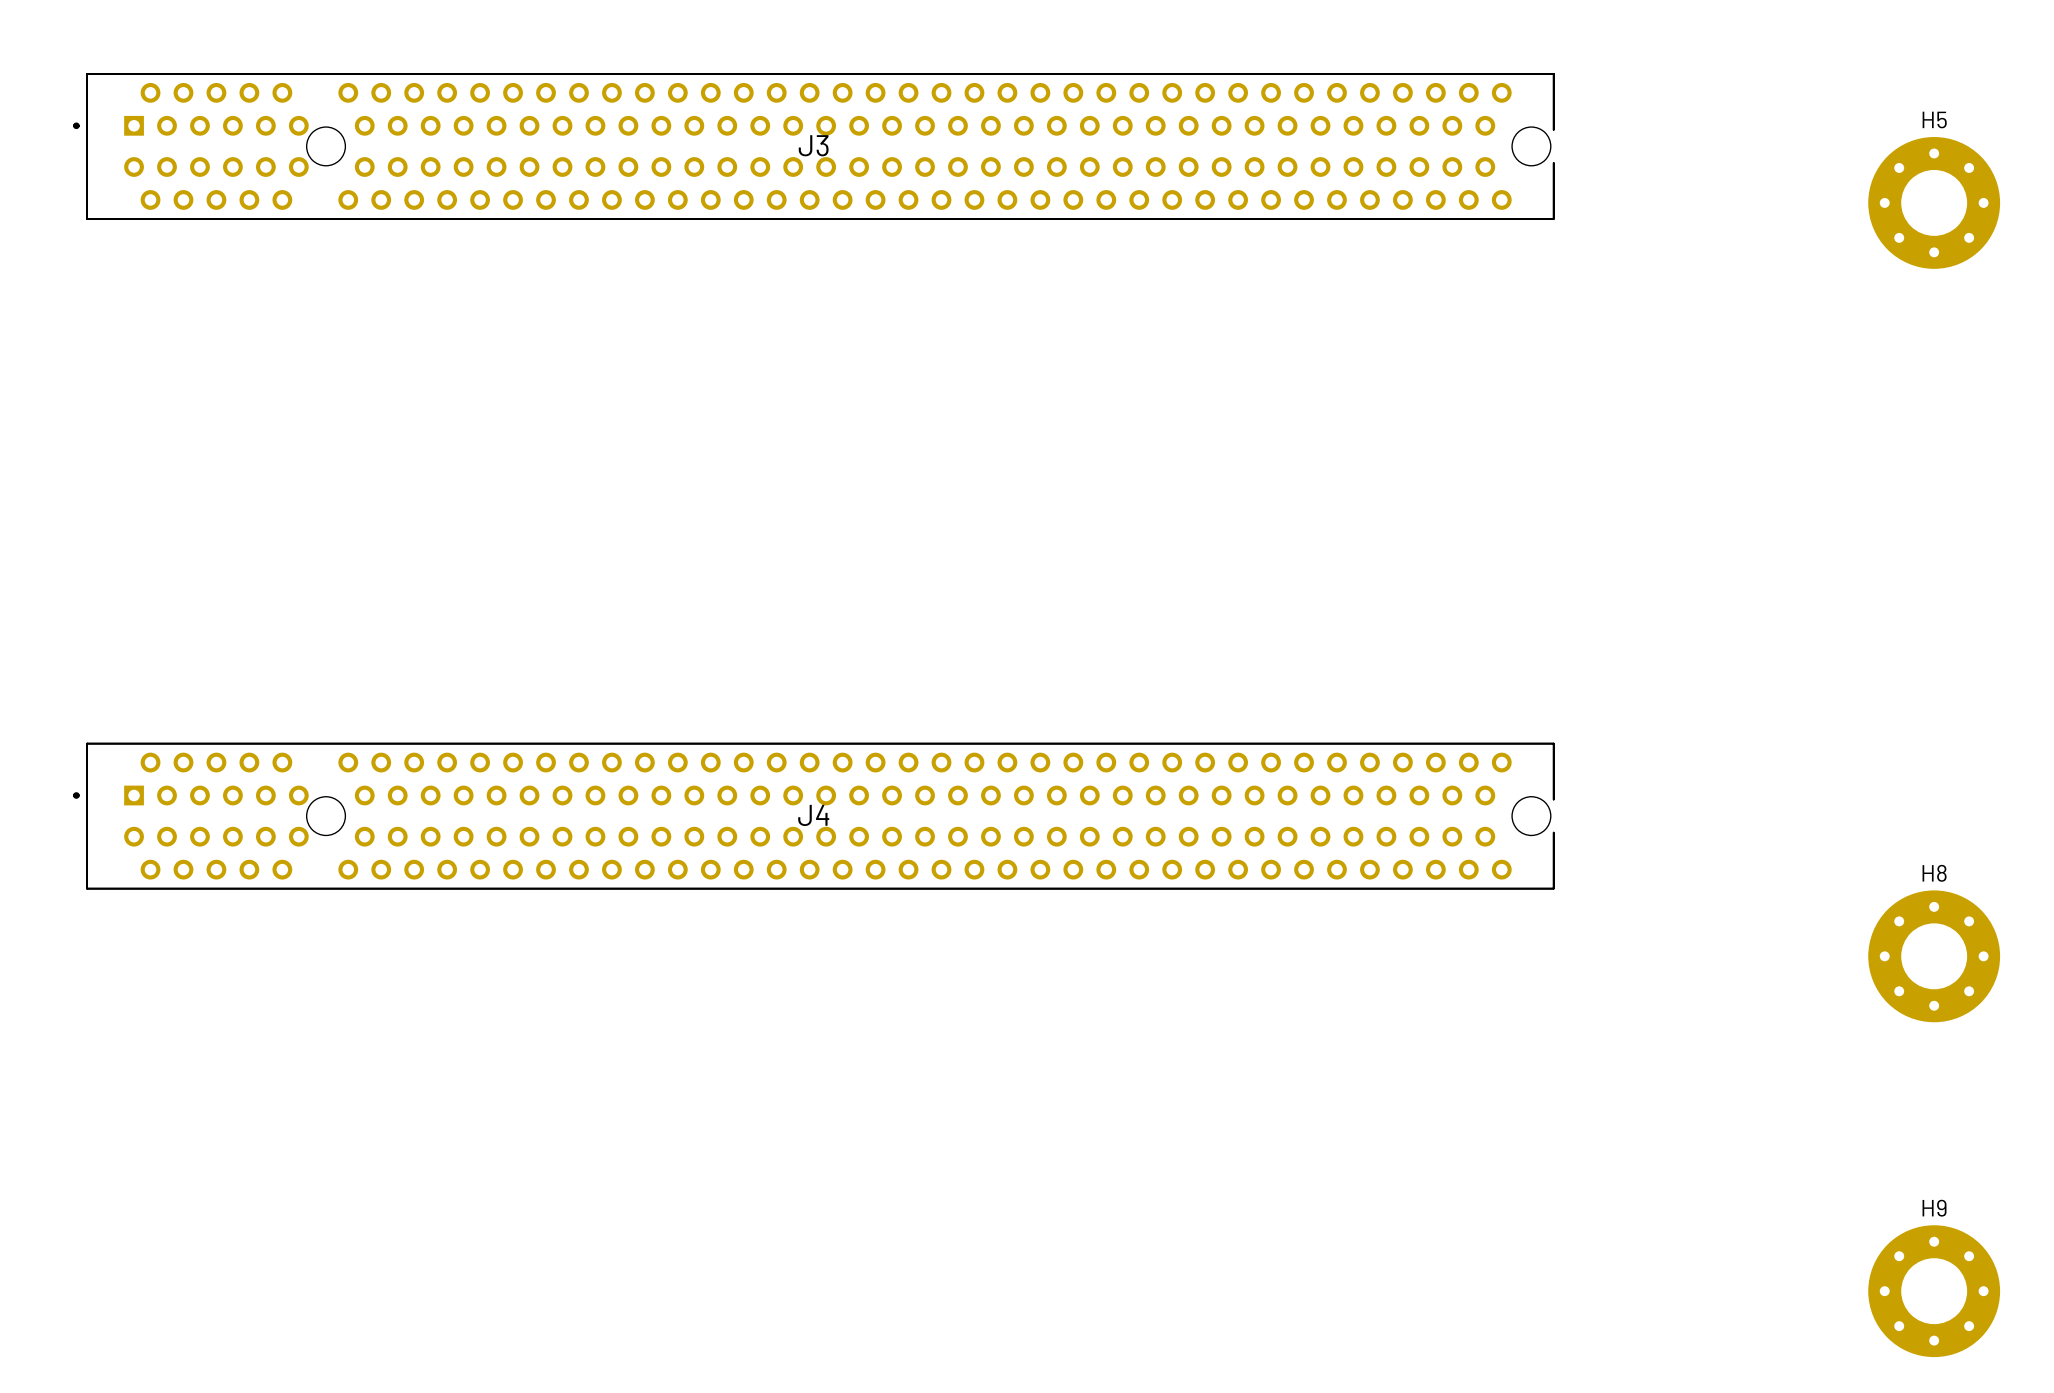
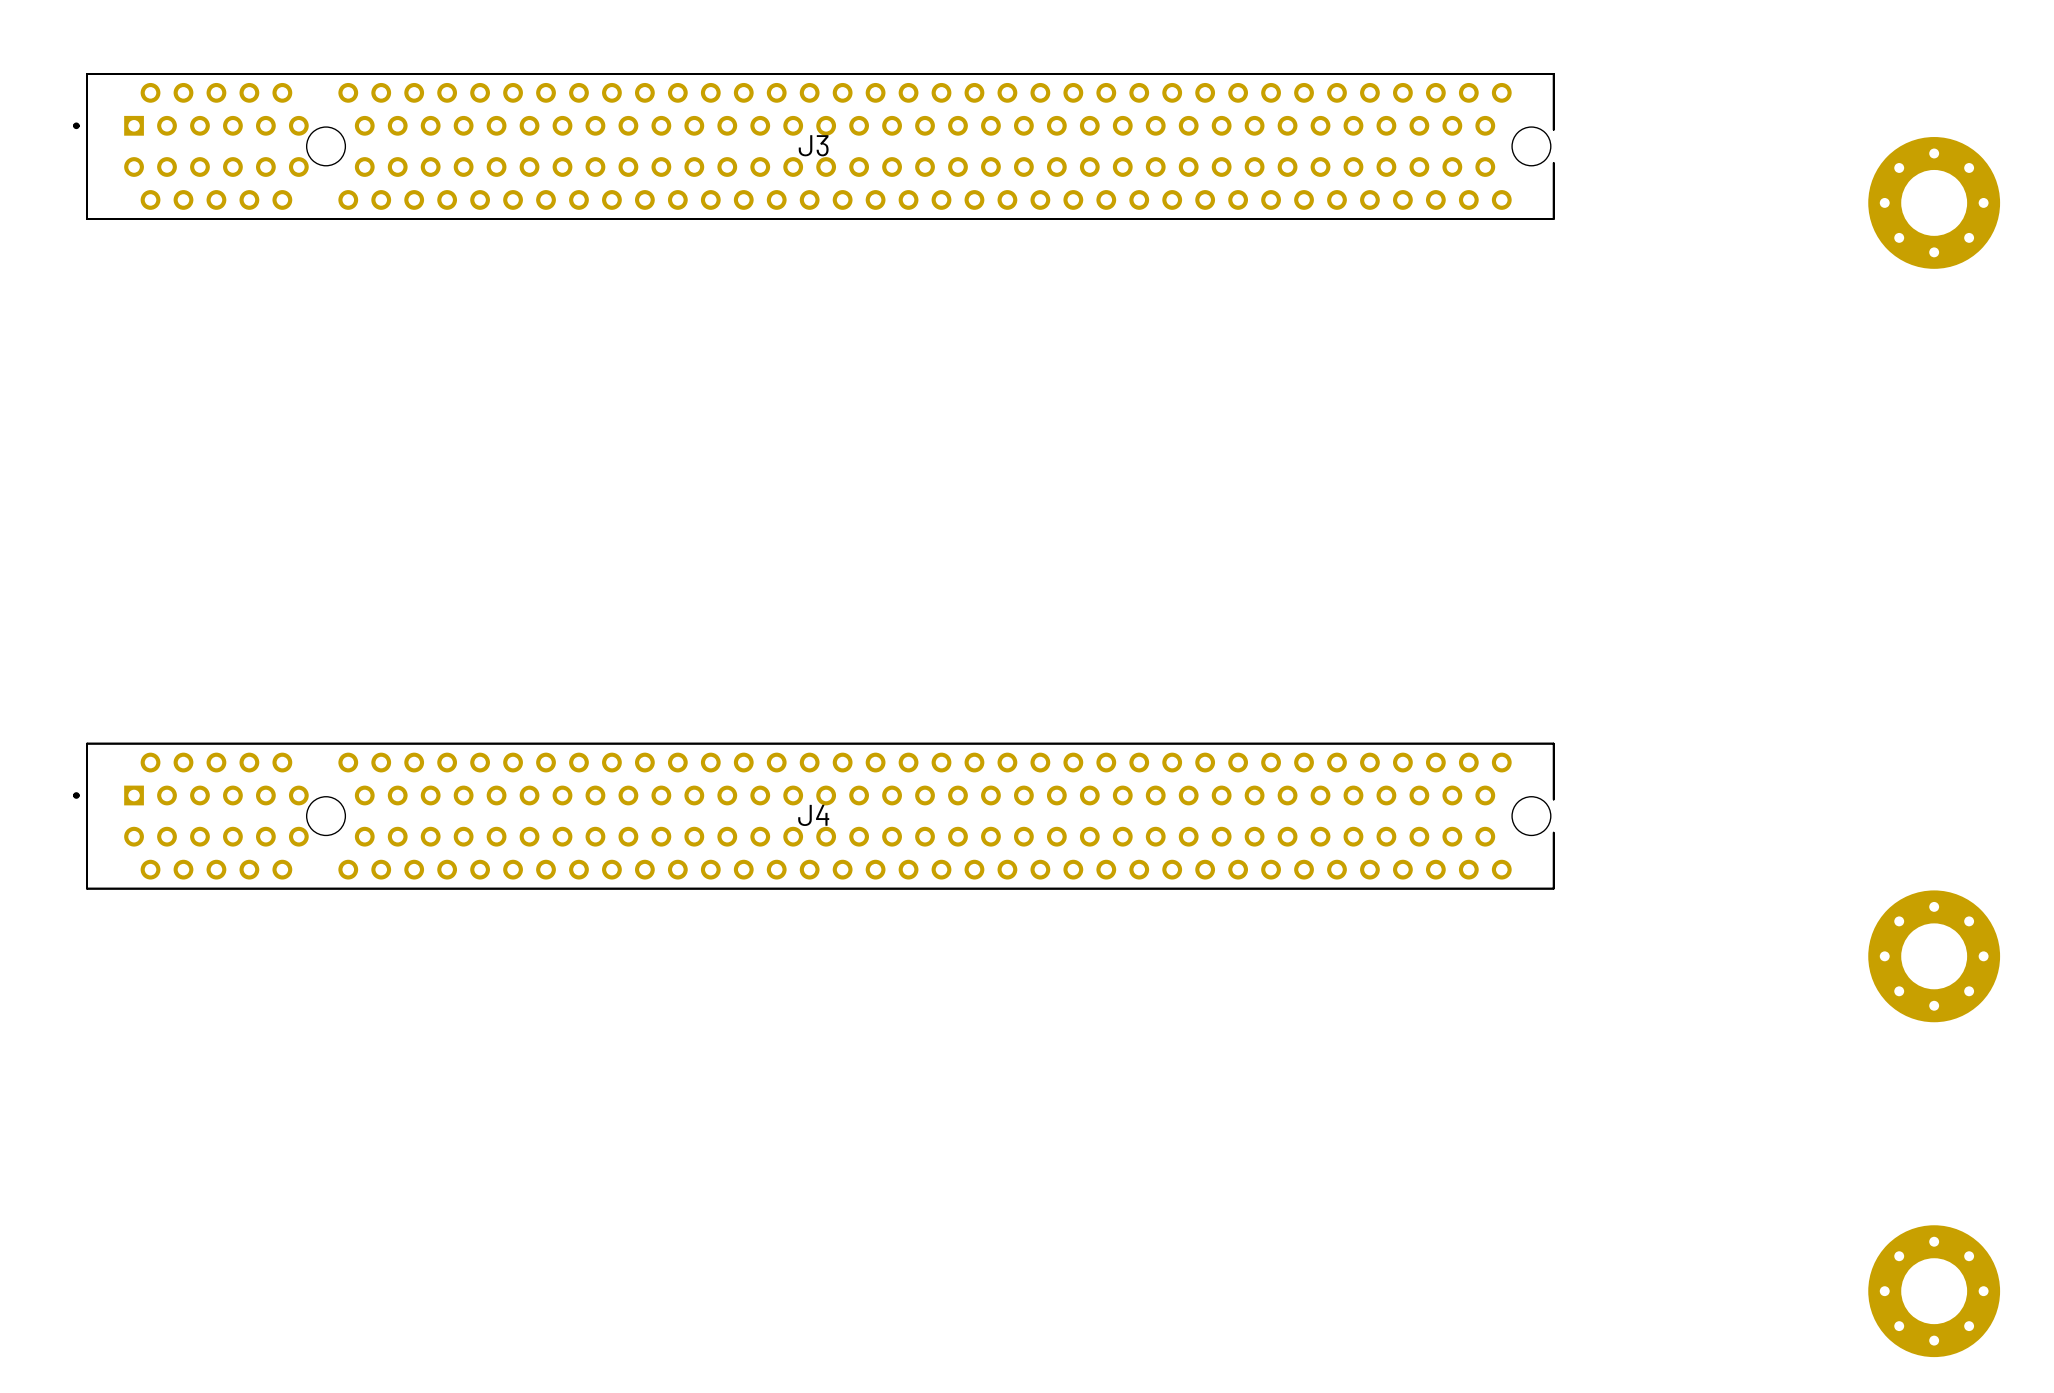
H5 name: H5 (1934, 120) -> none
H8 name: H8 (1934, 873) -> none
H9 name: H9 (1934, 1208) -> none

